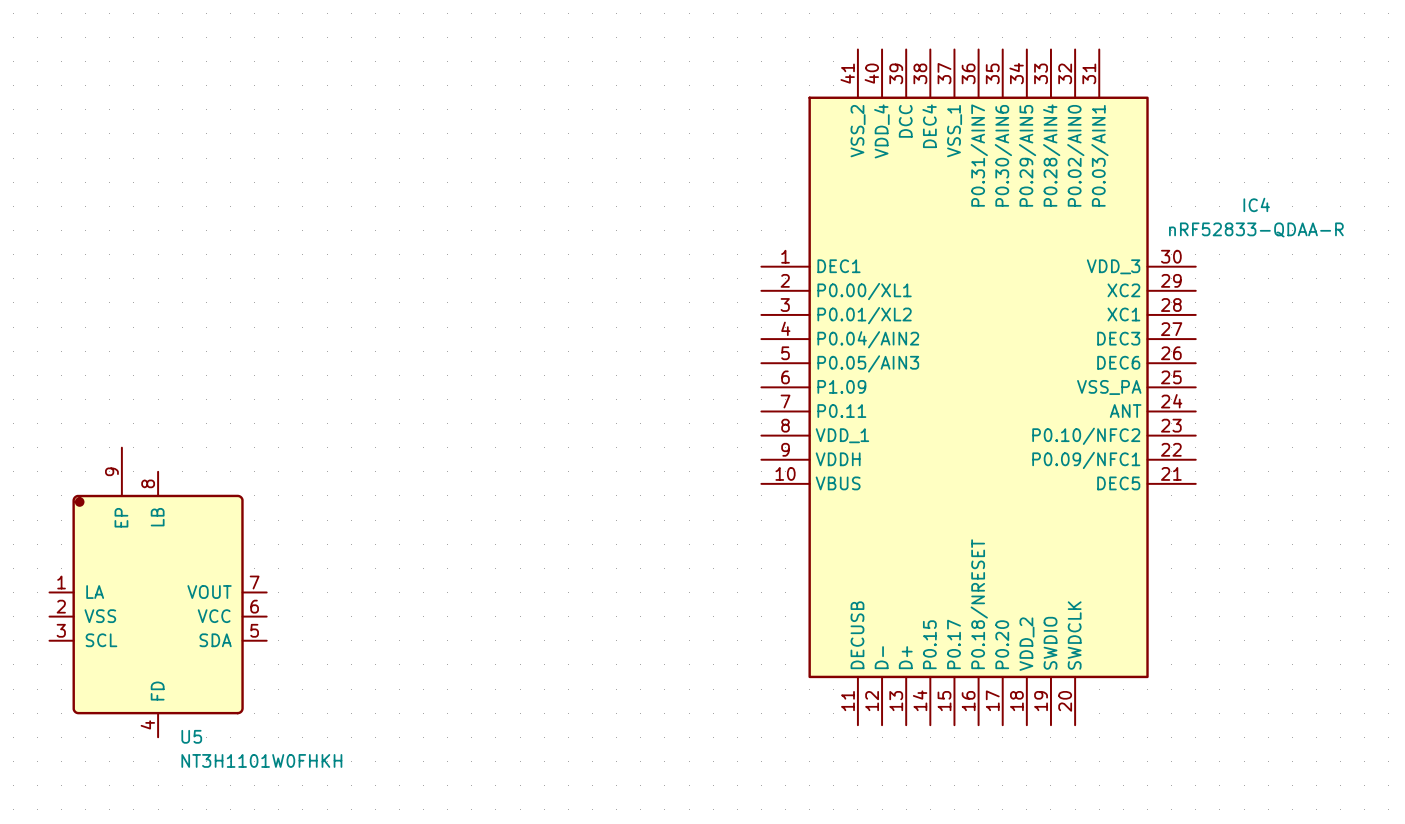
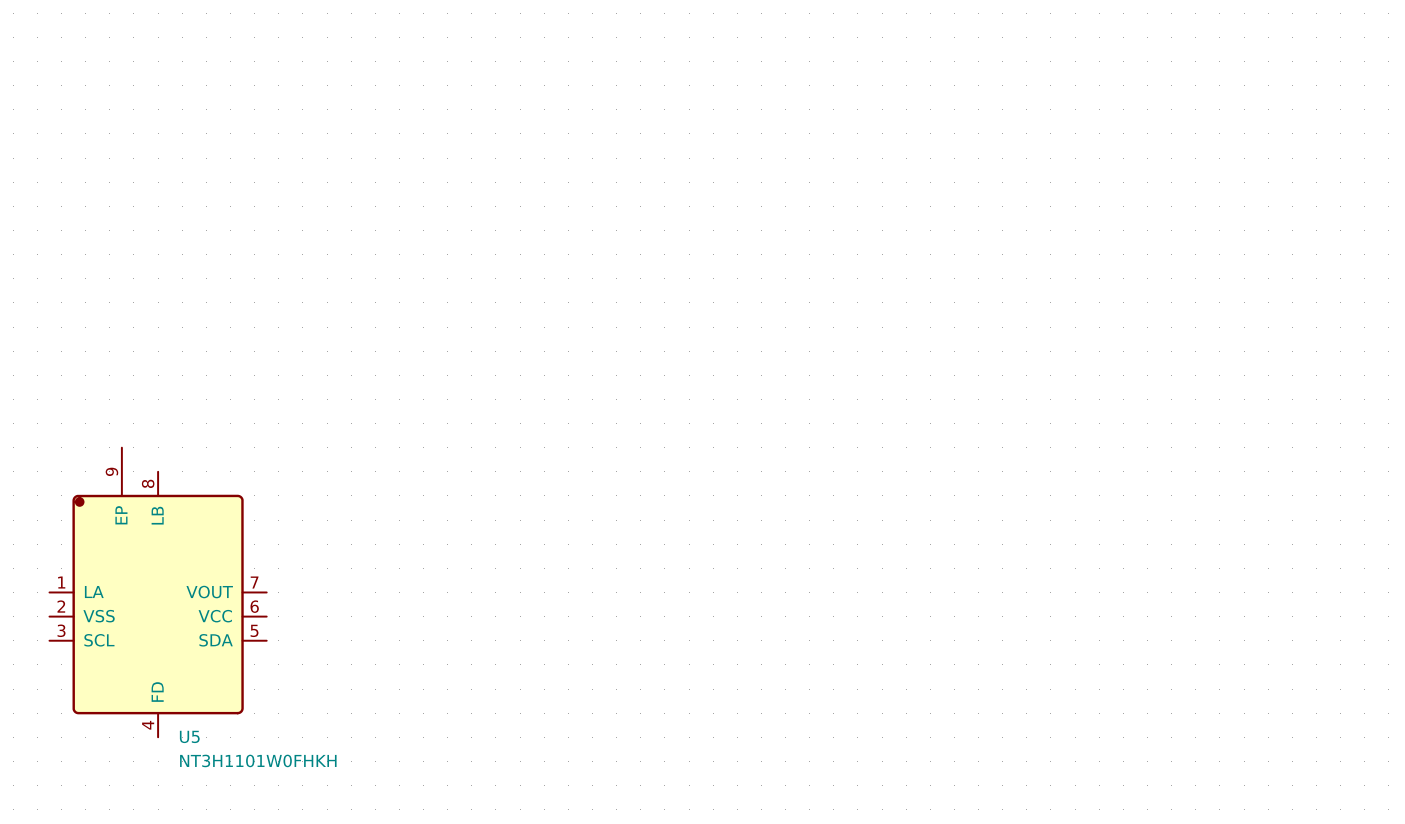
IC4: nRF52833-QDAA-R (978, 387) -> none

